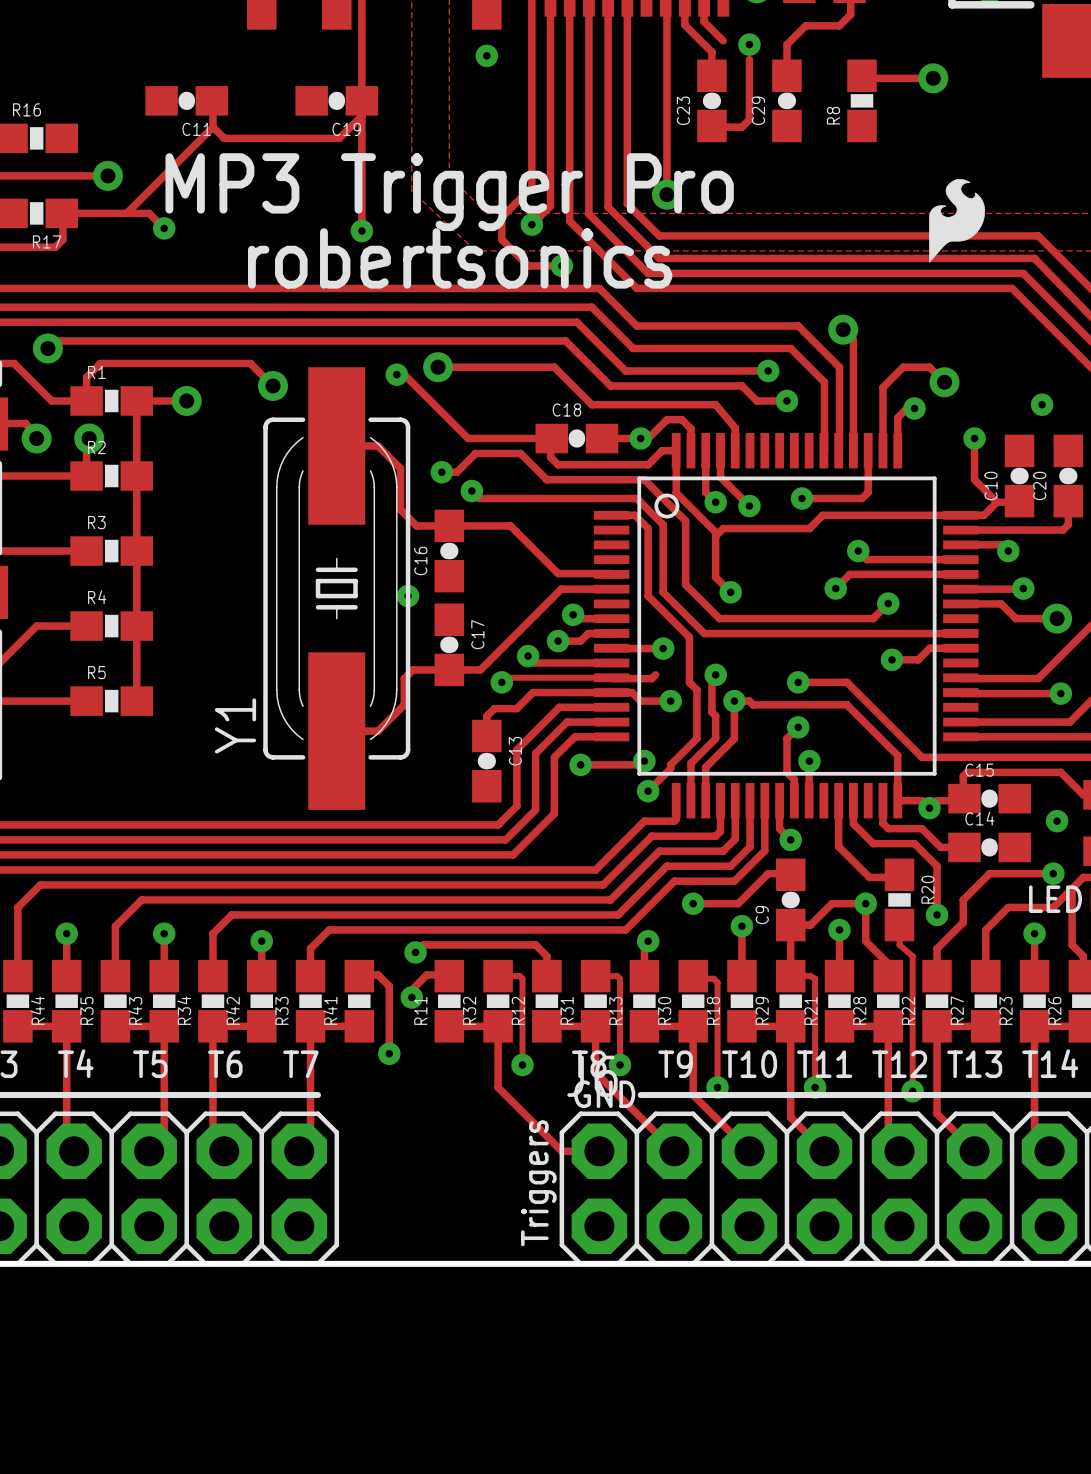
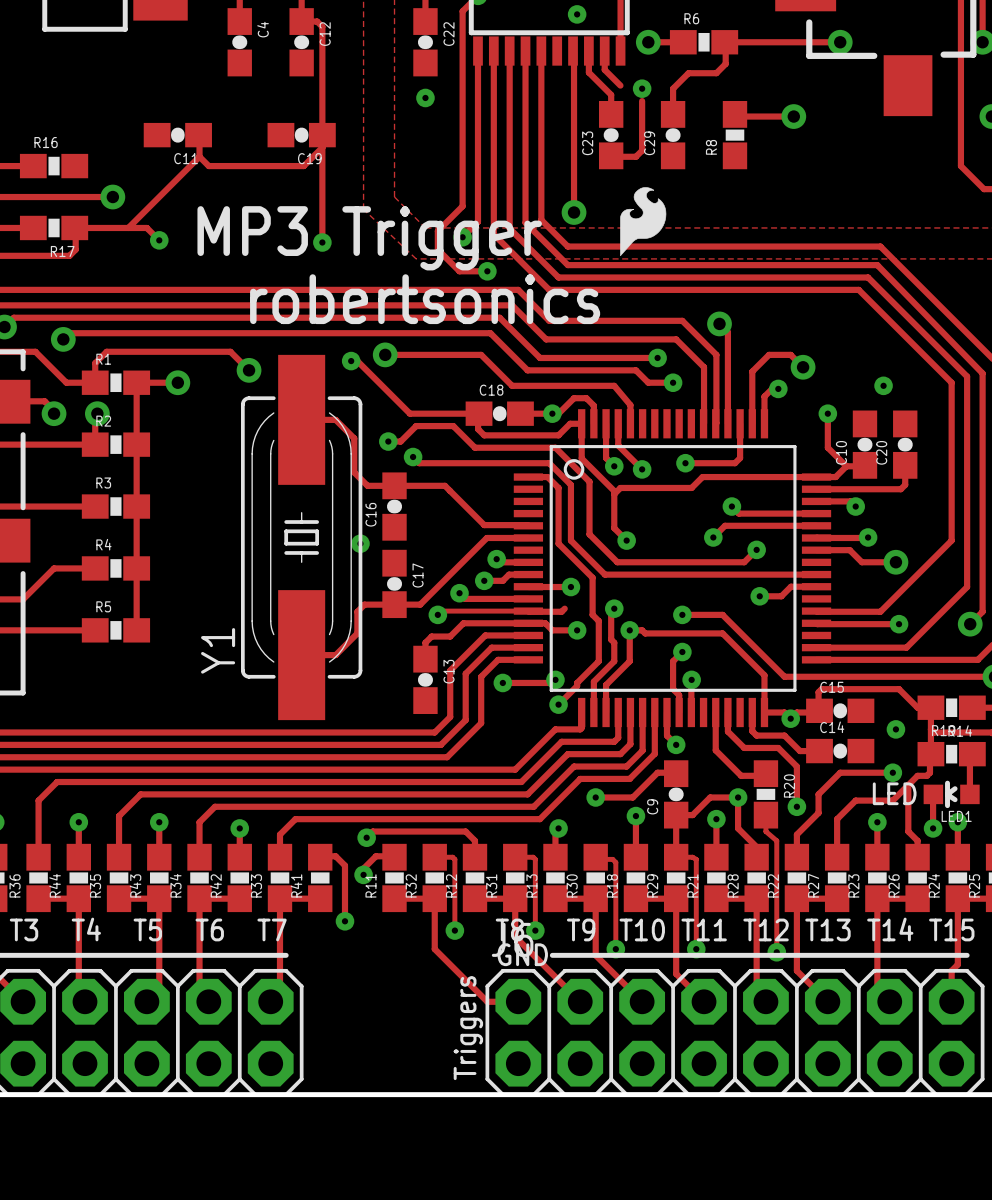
text: MP3 Trigger Pro (449, 192) -> MP3 Trigger (369, 238)
drawing position: (957, 220) -> (643, 221)
text position: robertsonics (460, 258) -> robertsonics (425, 299)

